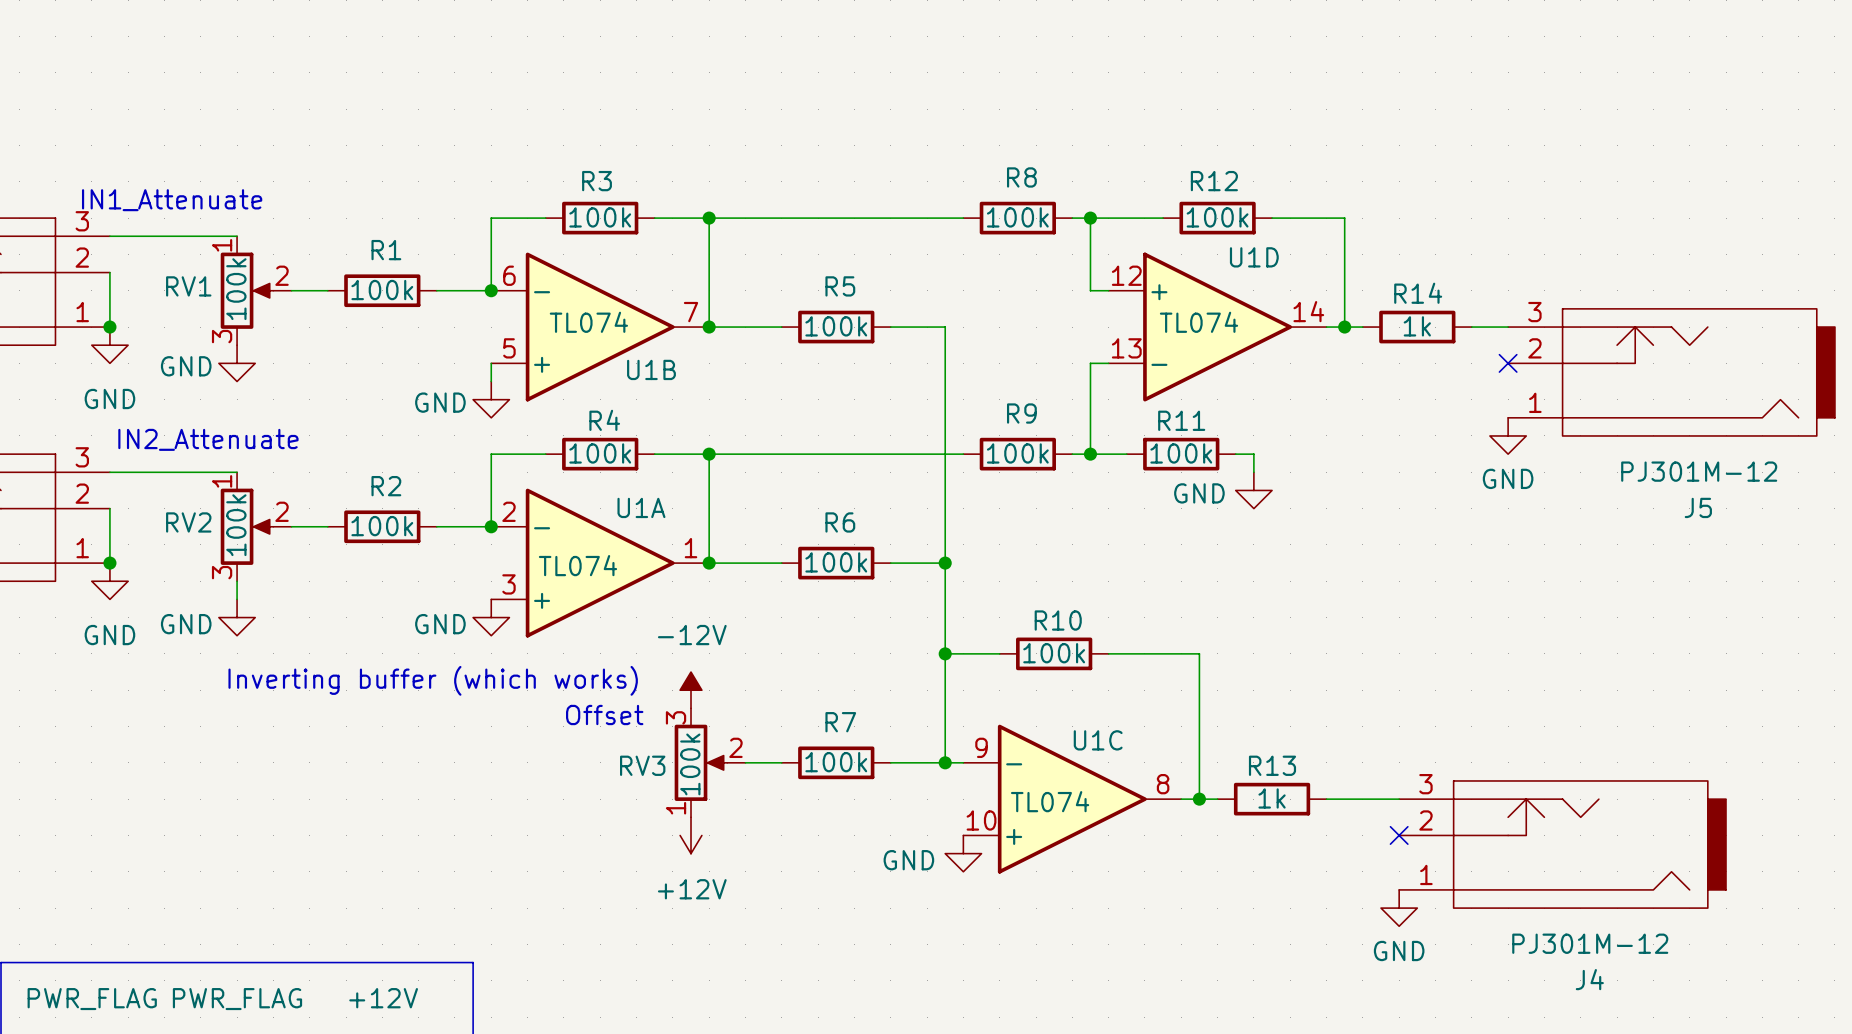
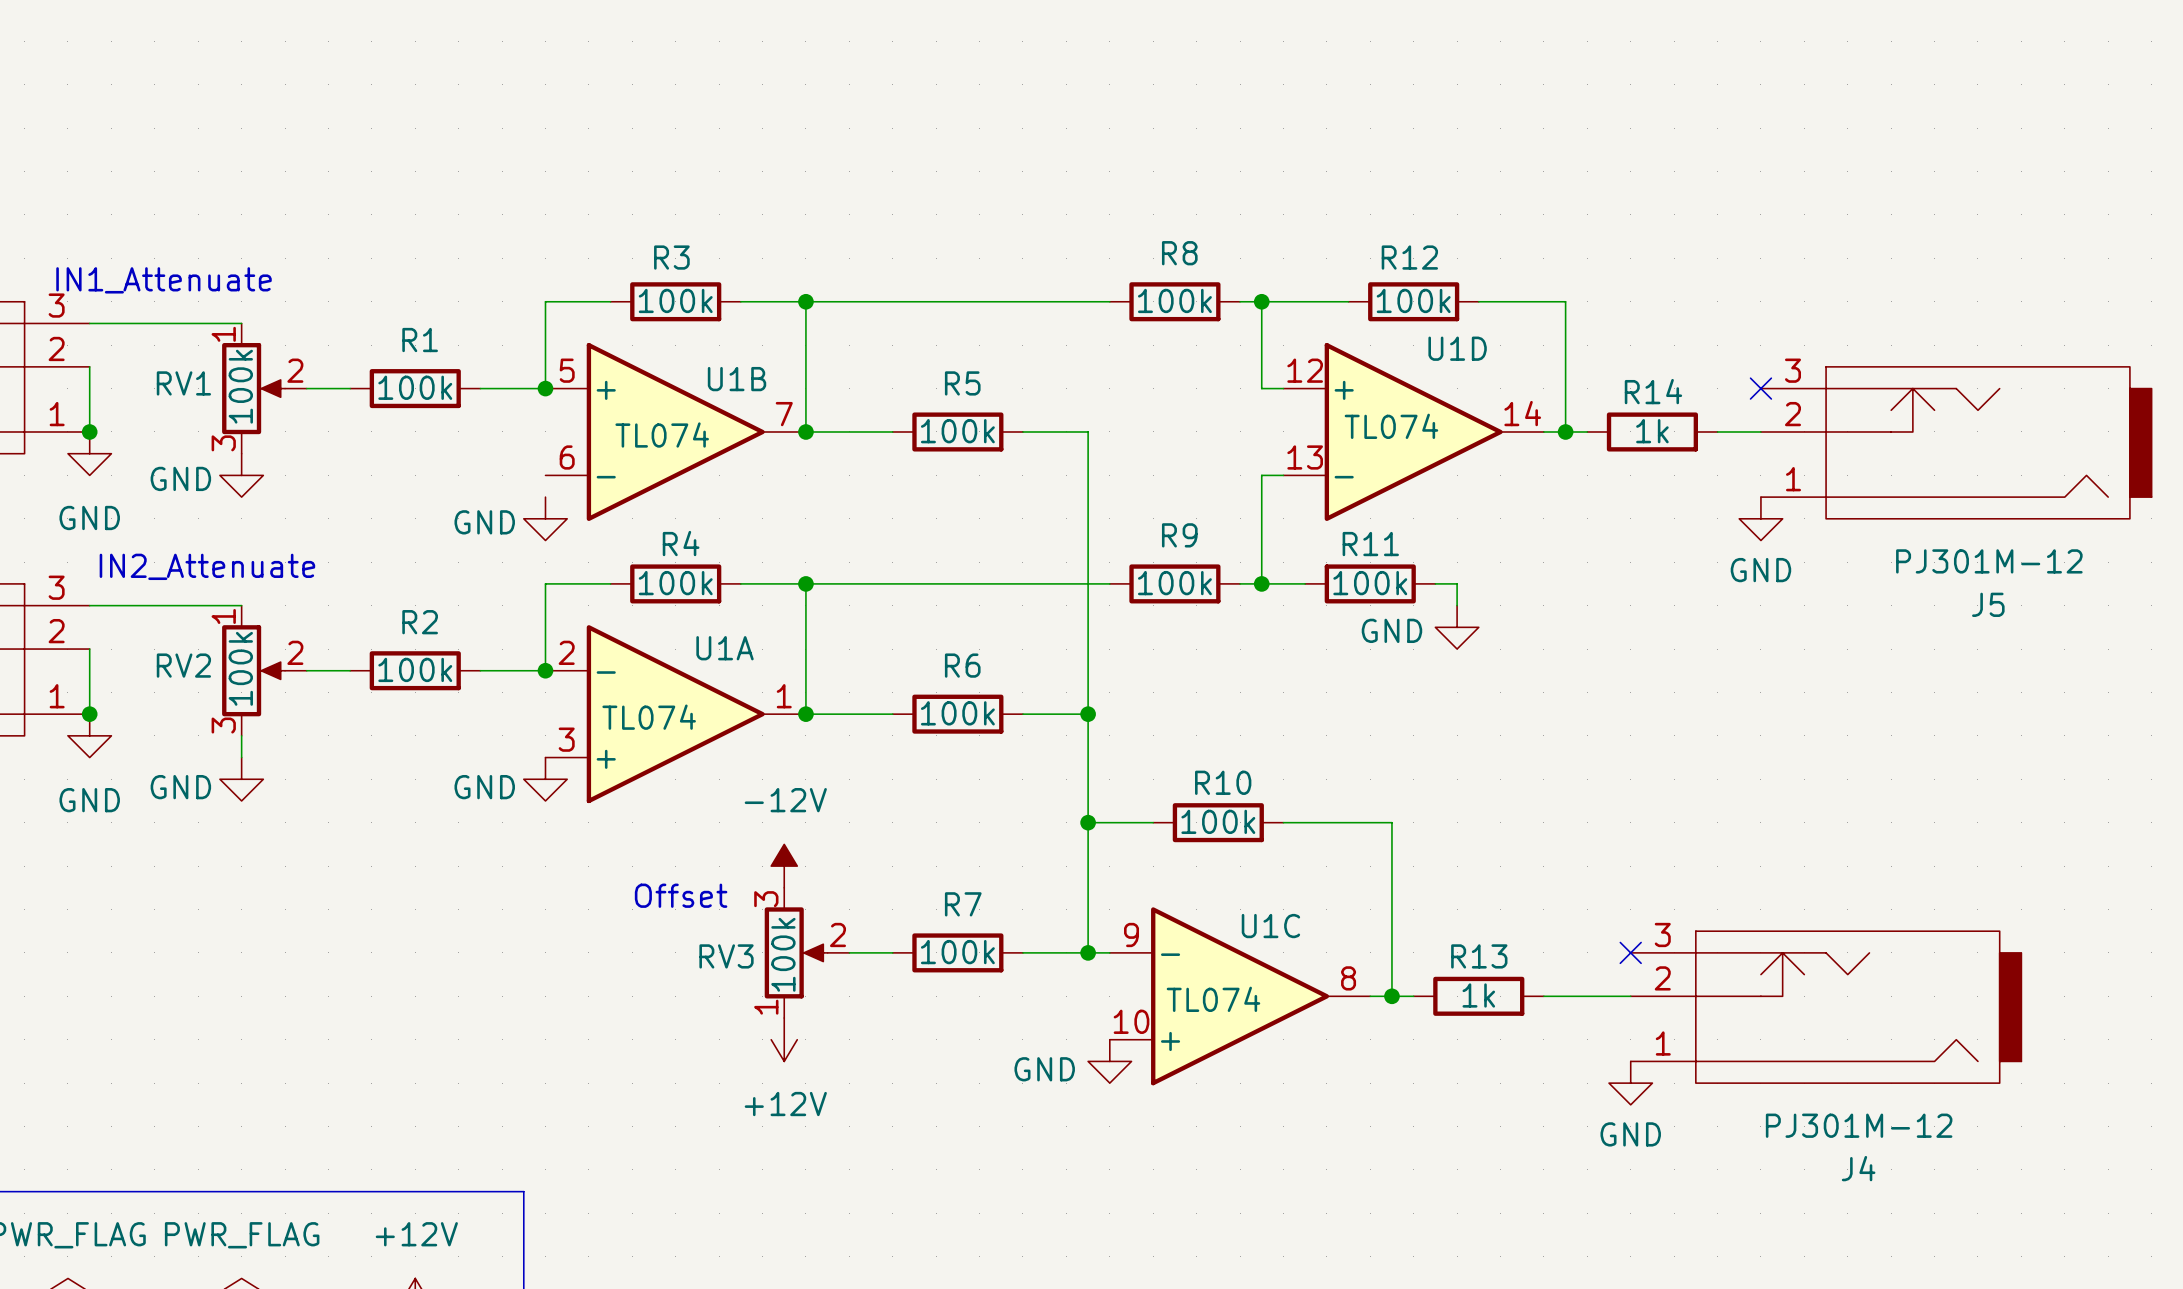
U1B flip: as is (600, 327) -> up-down (675, 431)
wire: (491, 363) (491, 381) -> none
no-connect mark position: (1508, 363) -> (1760, 388)
J5 position: (1671, 372) -> (1956, 442)
power symbol position: GND (1508, 435) -> GND (1760, 518)
text: Inverting buffer (which works) (433, 680) -> none
no-connect mark position: (1399, 835) -> (1630, 952)
J4 position: (1562, 844) -> (1826, 1007)
power symbol position: GND (1399, 908) -> GND (1630, 1083)

